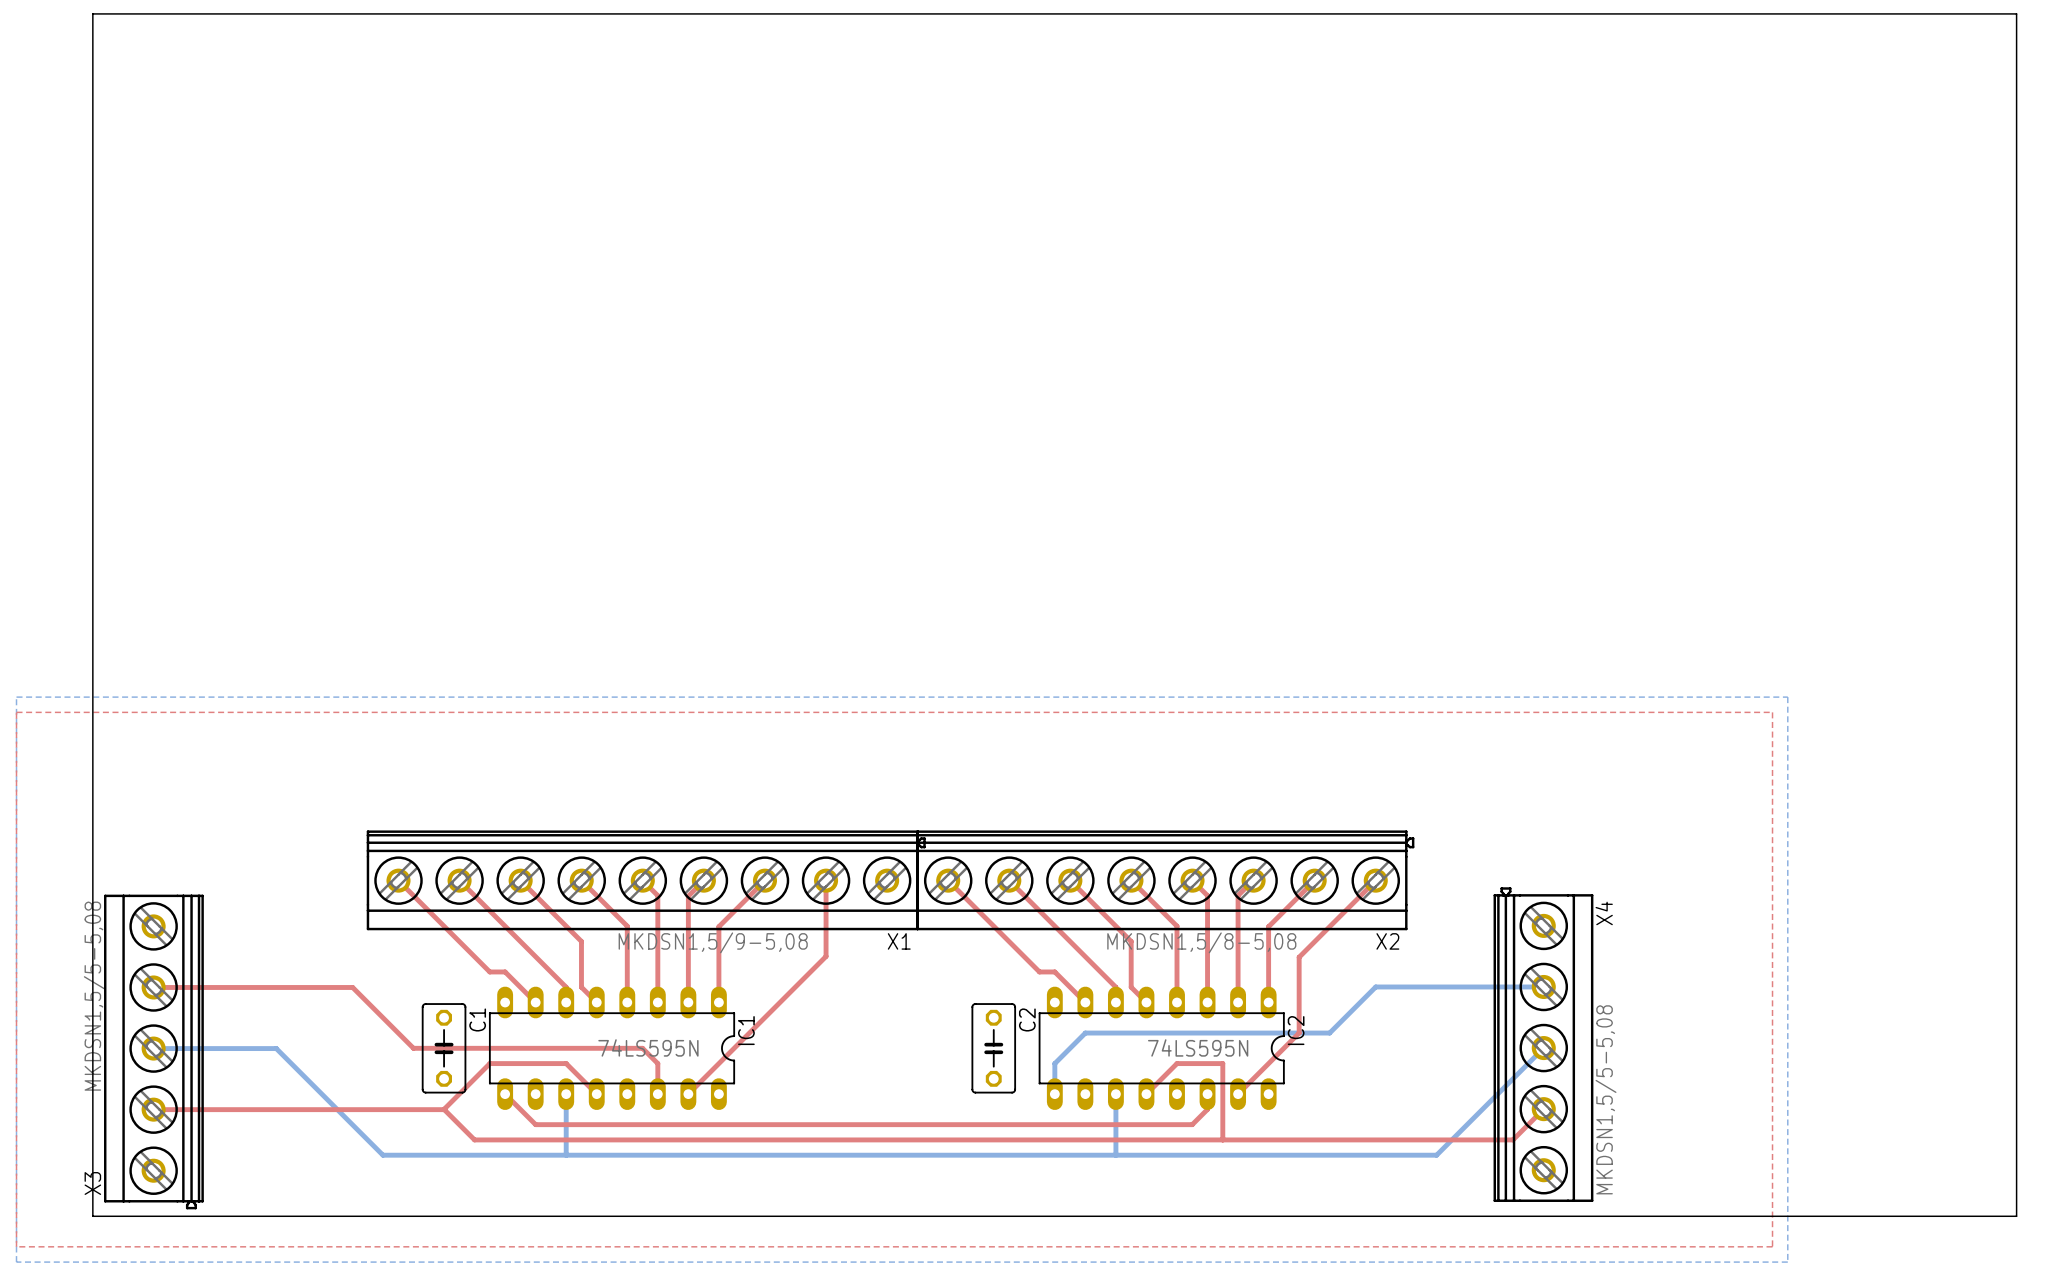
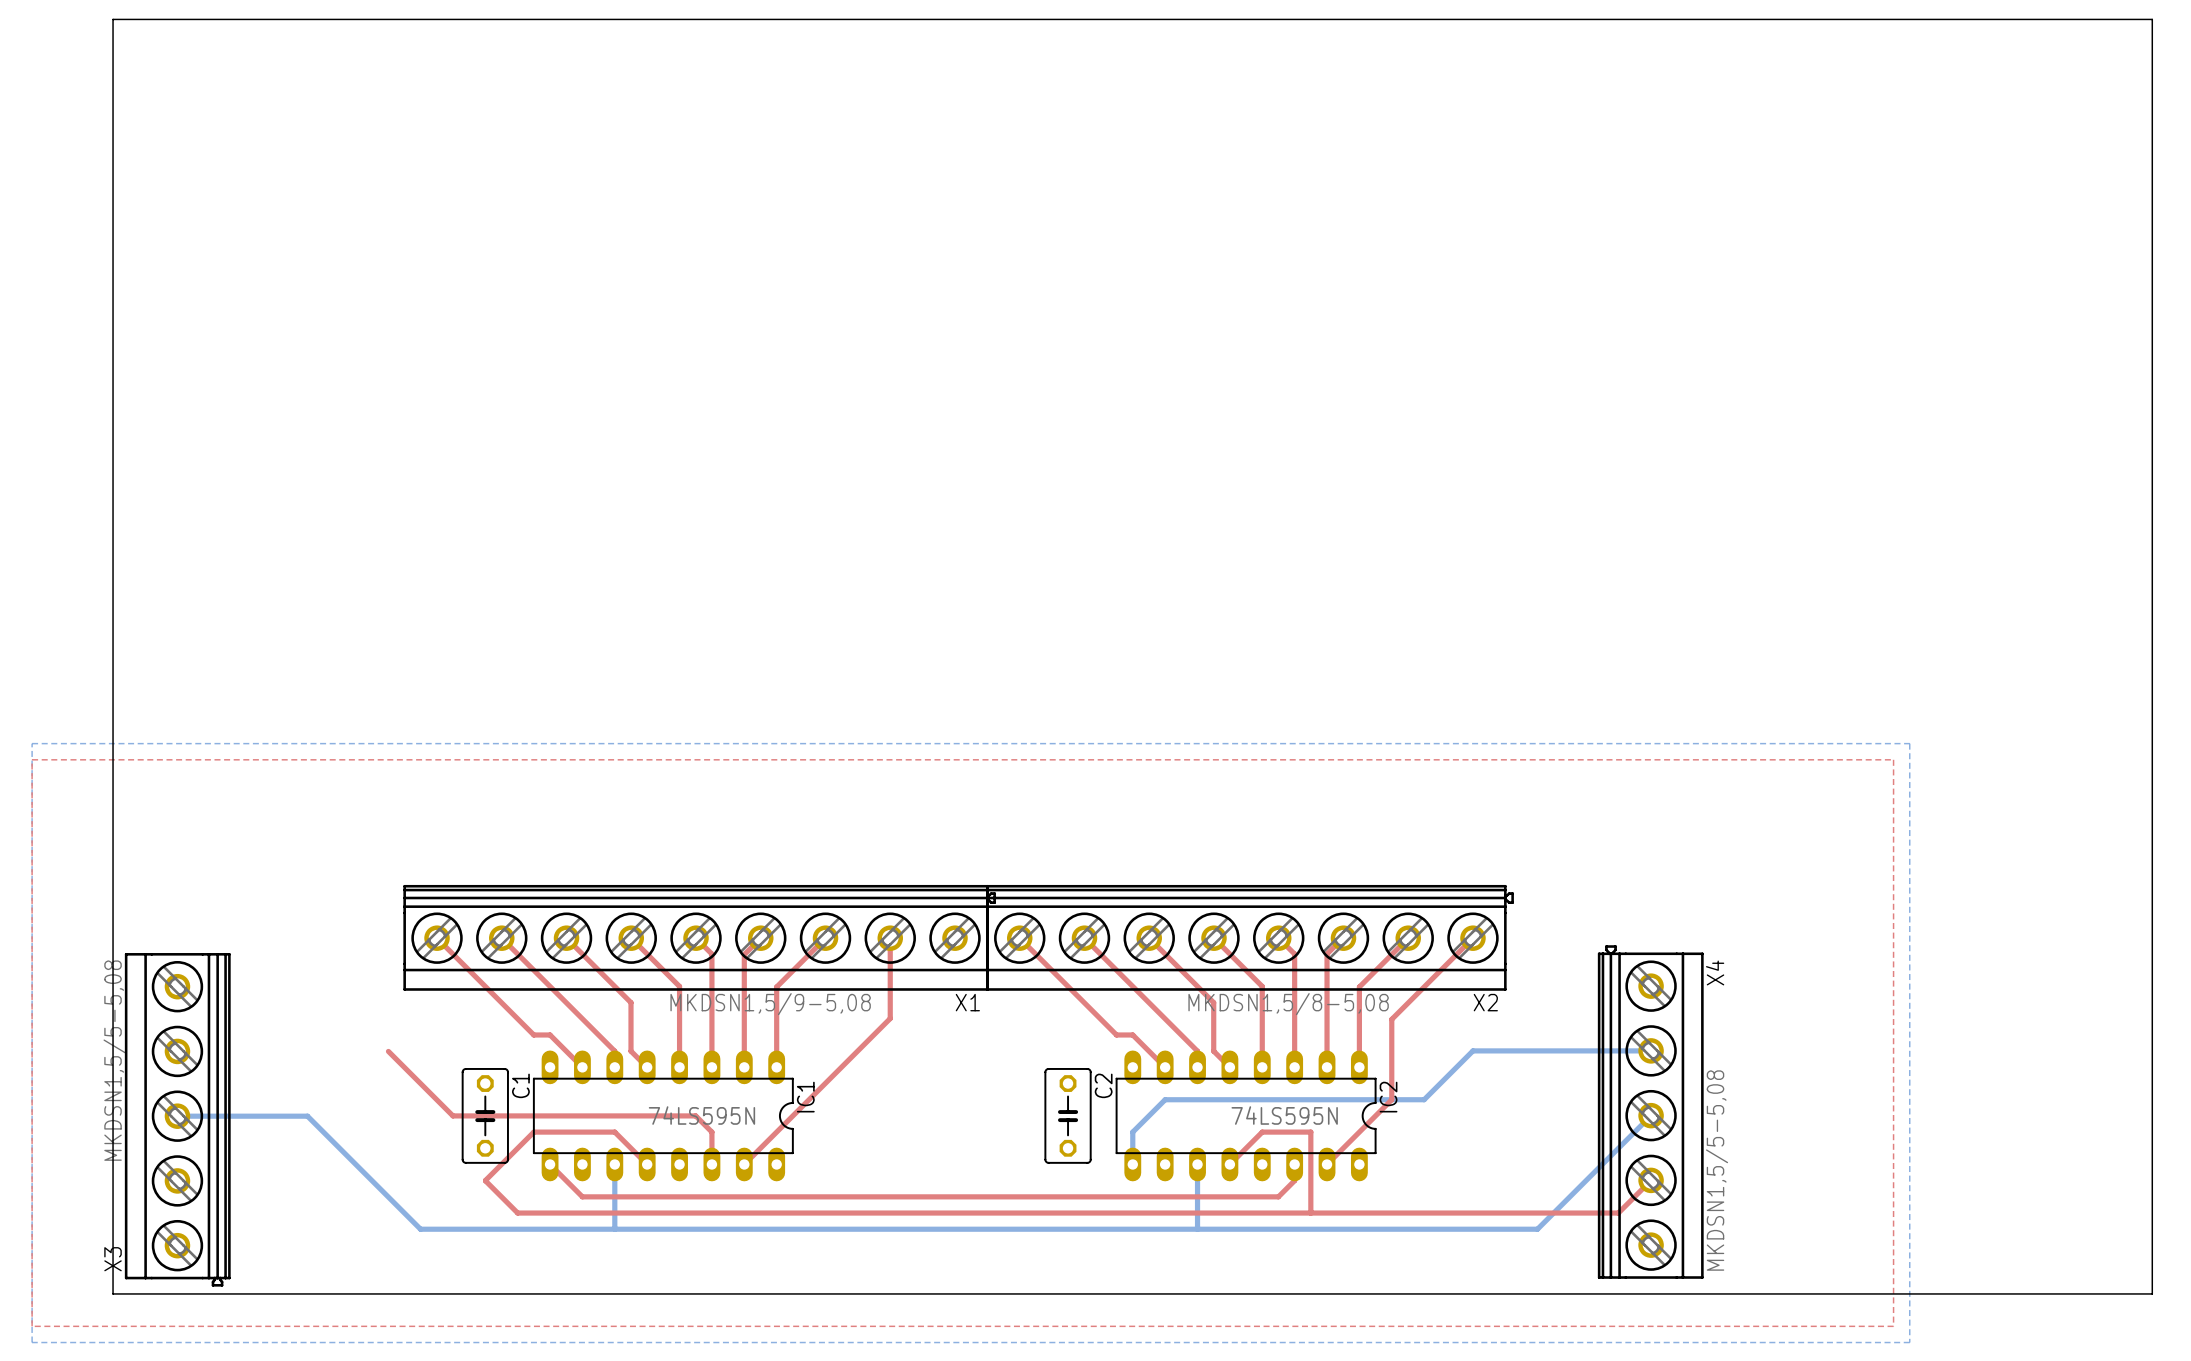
top track: (153, 987) (352, 987) -> none
top track: (153, 1109) (444, 1109) -> none

